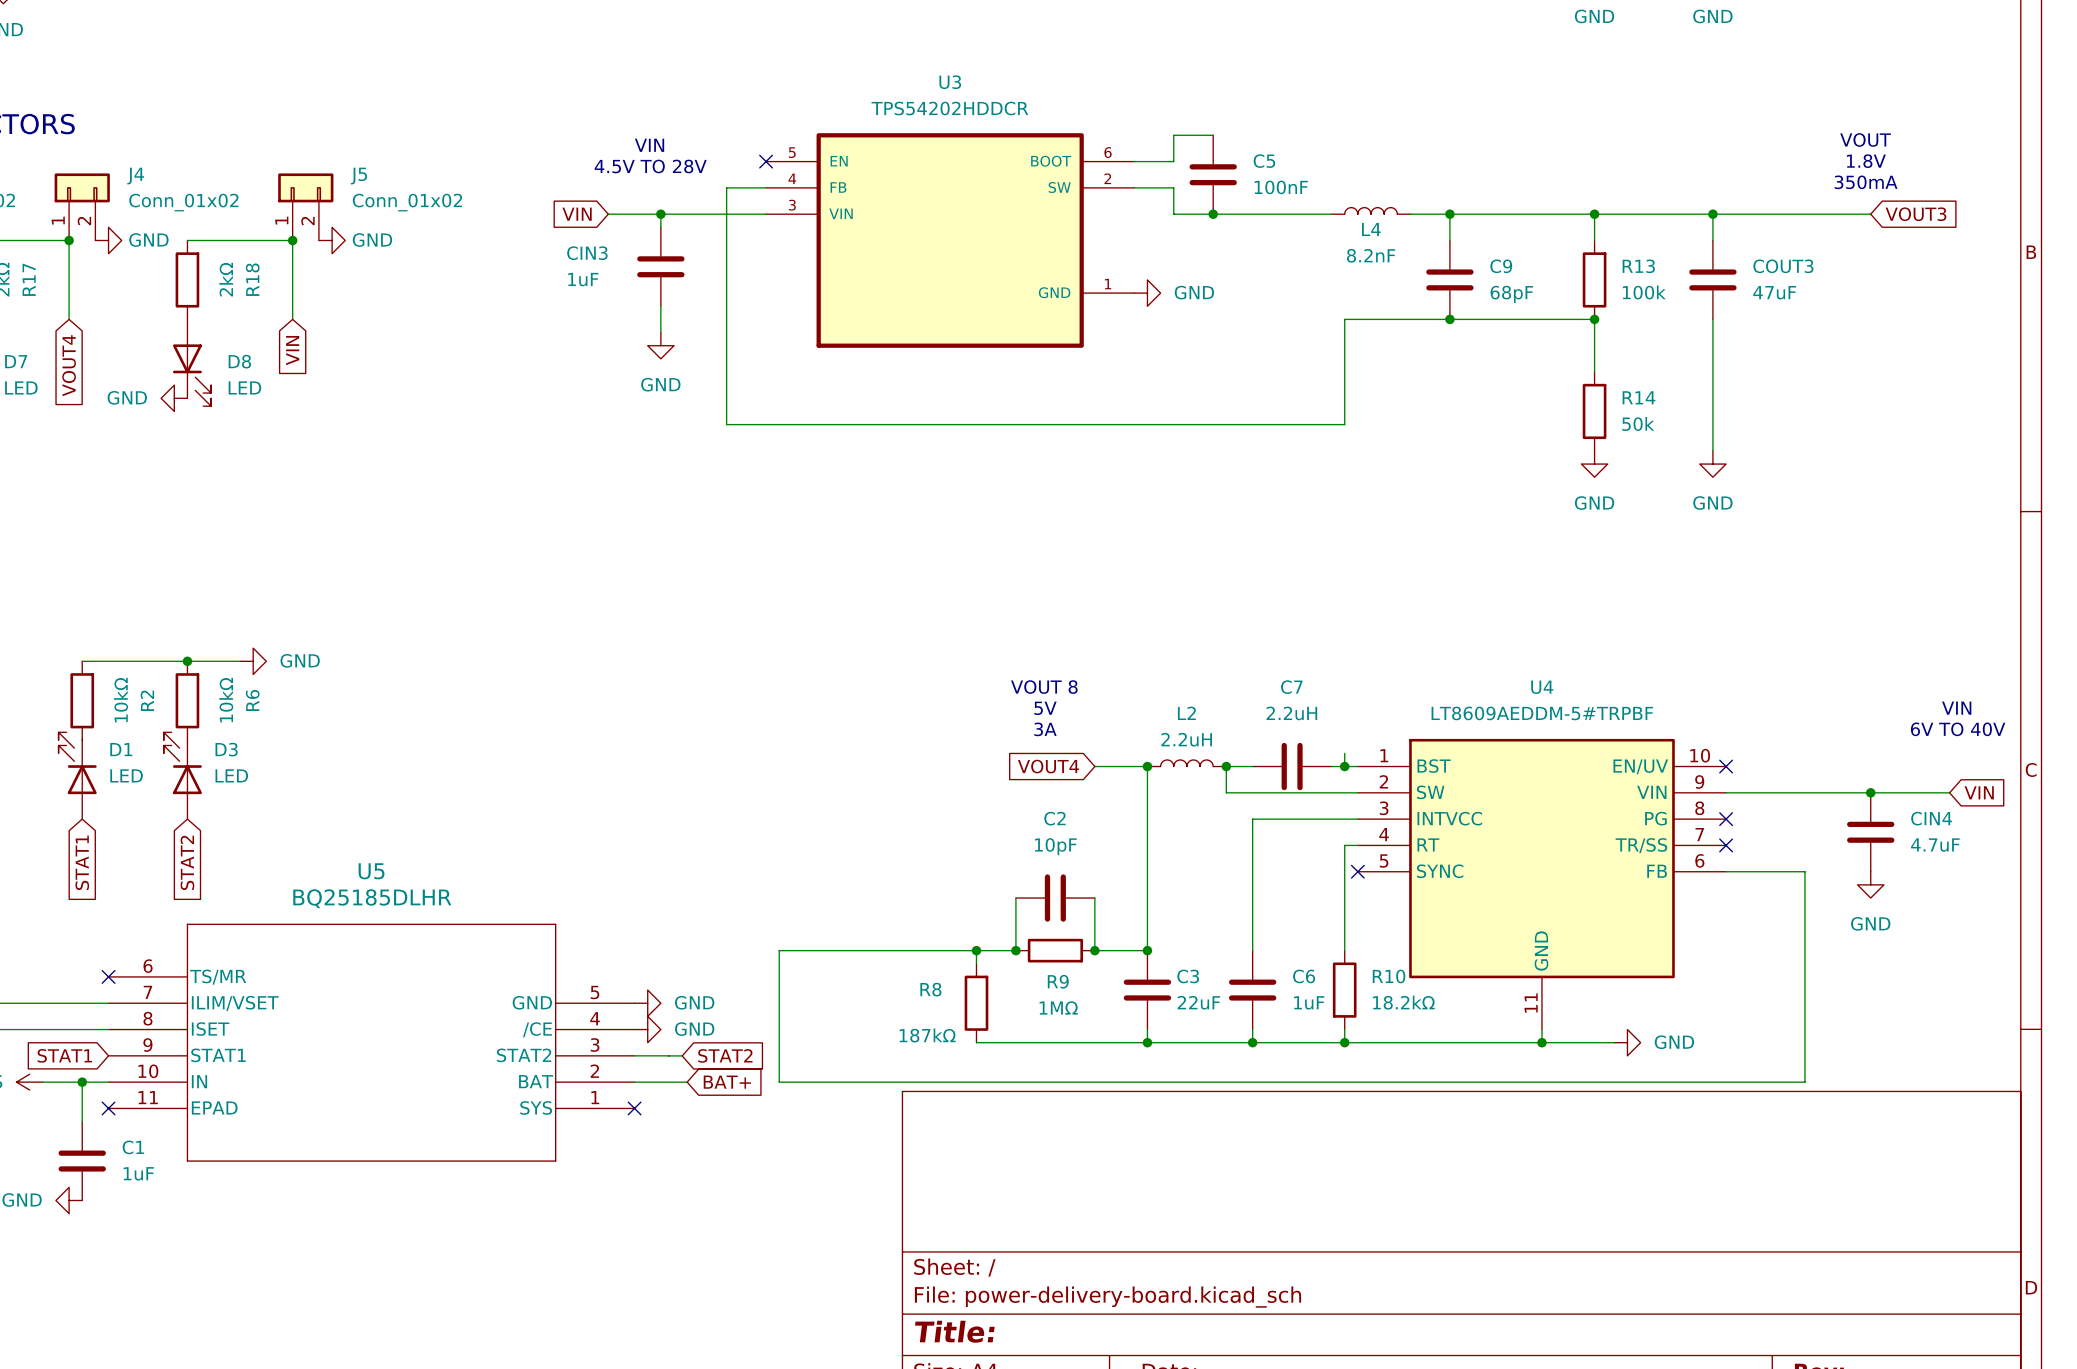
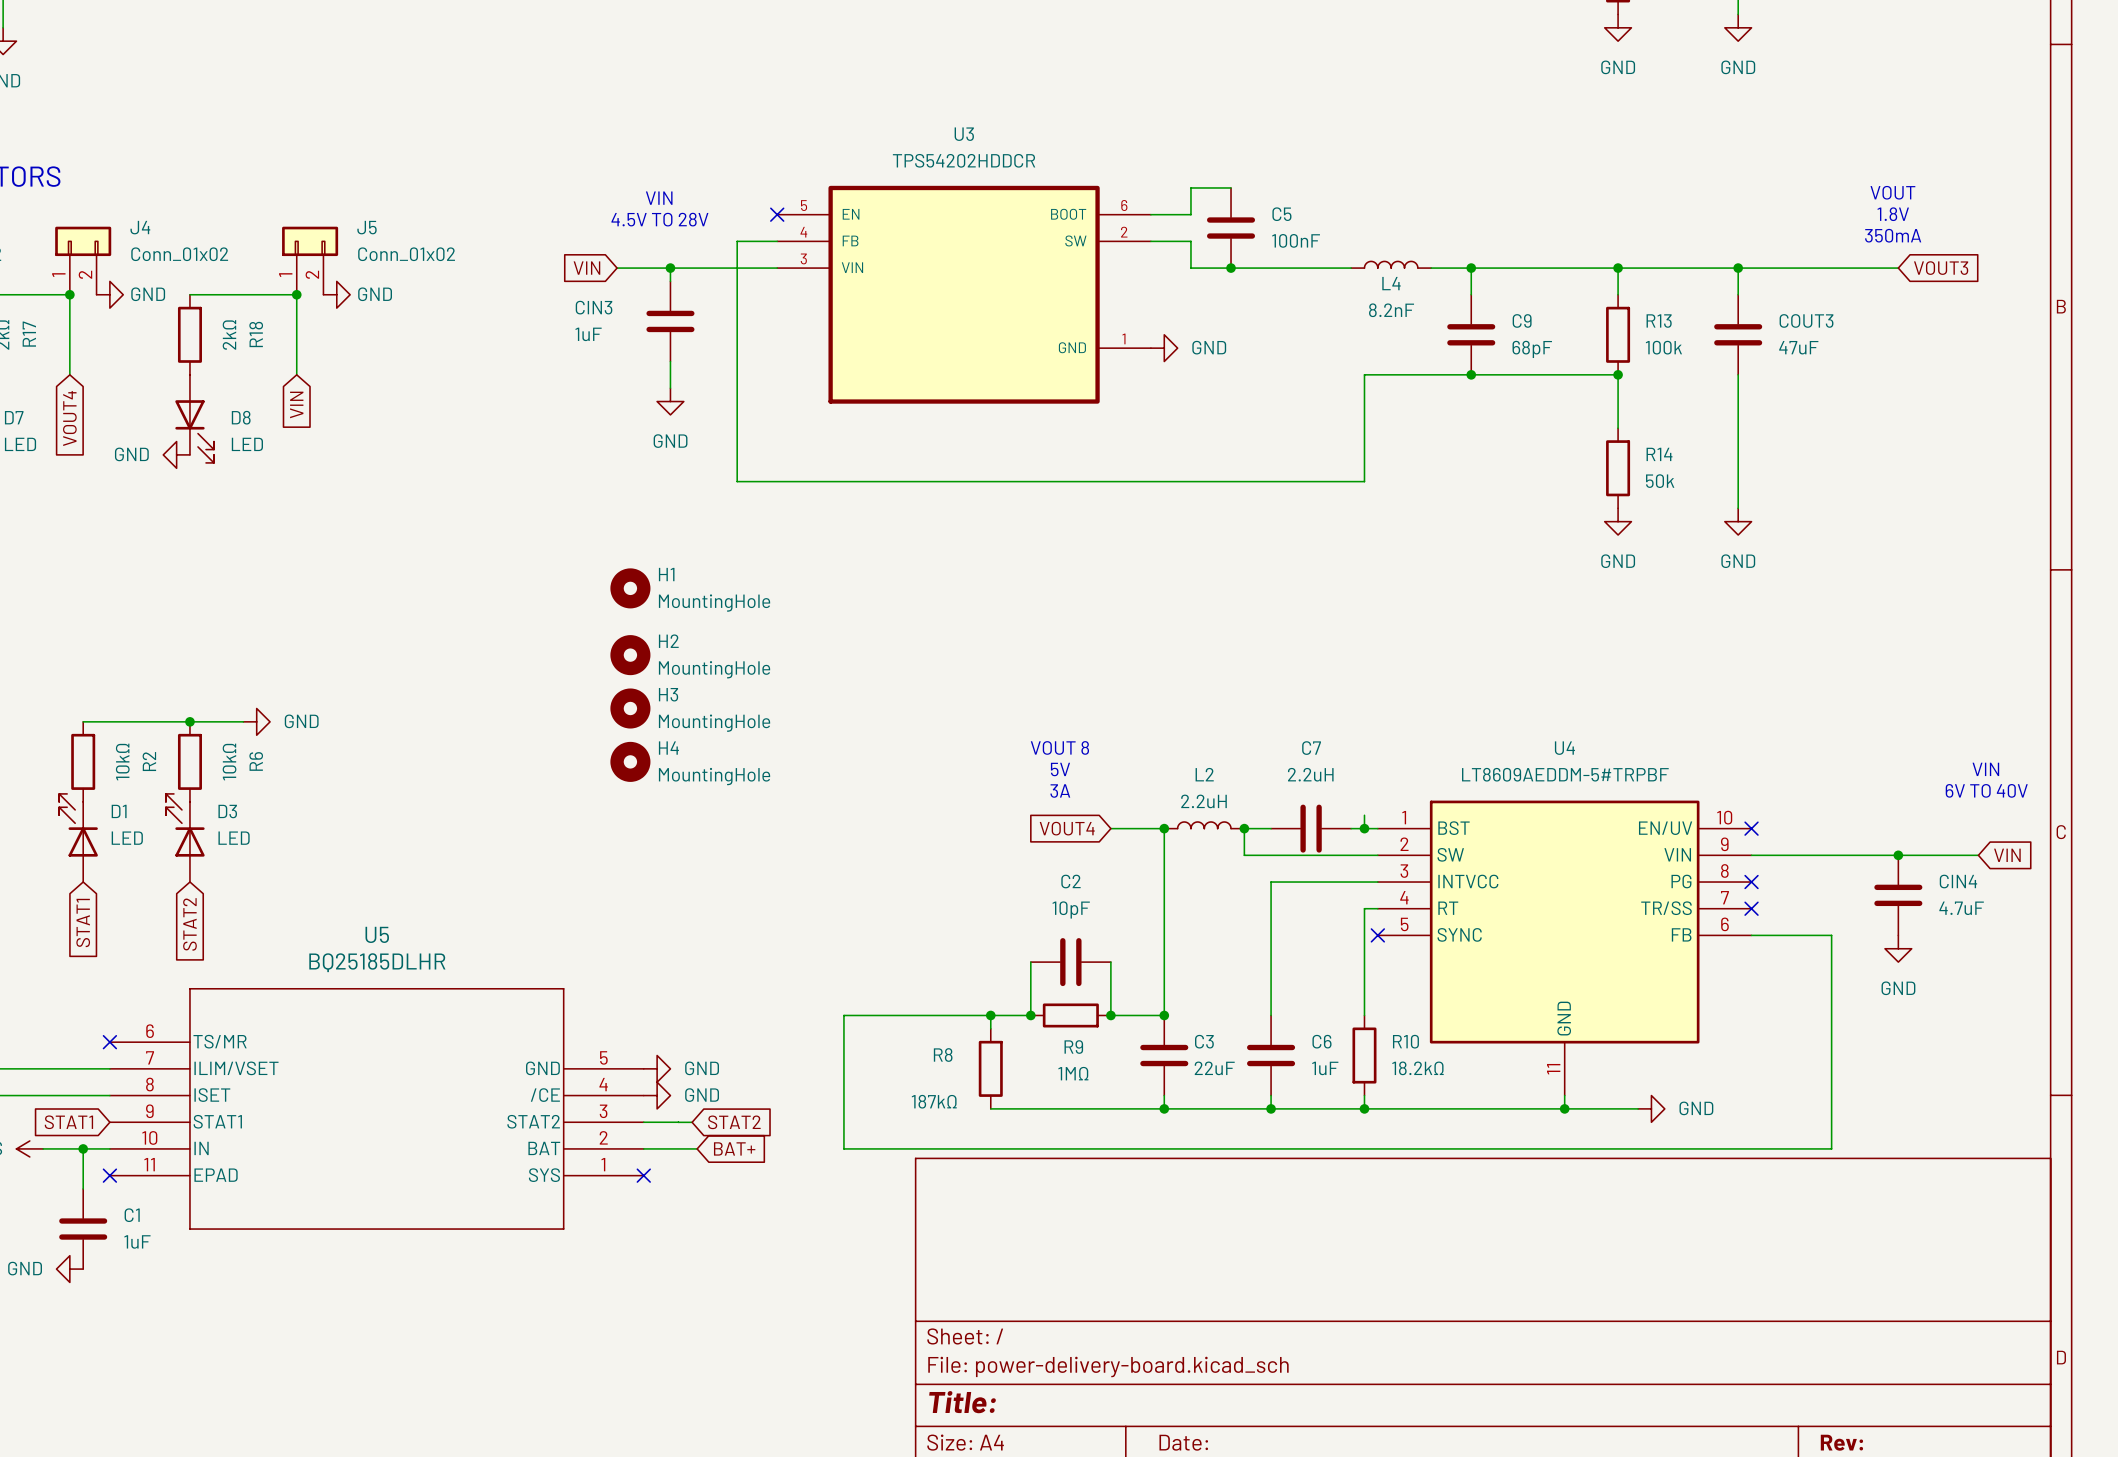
H1: none -> MountingHole (630, 588)
H2: none -> MountingHole (630, 655)
H3: none -> MountingHole (630, 708)
H4: none -> MountingHole (630, 761)
wire: (831, 950) (779, 950) (779, 1082) (831, 1082) -> (843, 1015) (843, 1148)

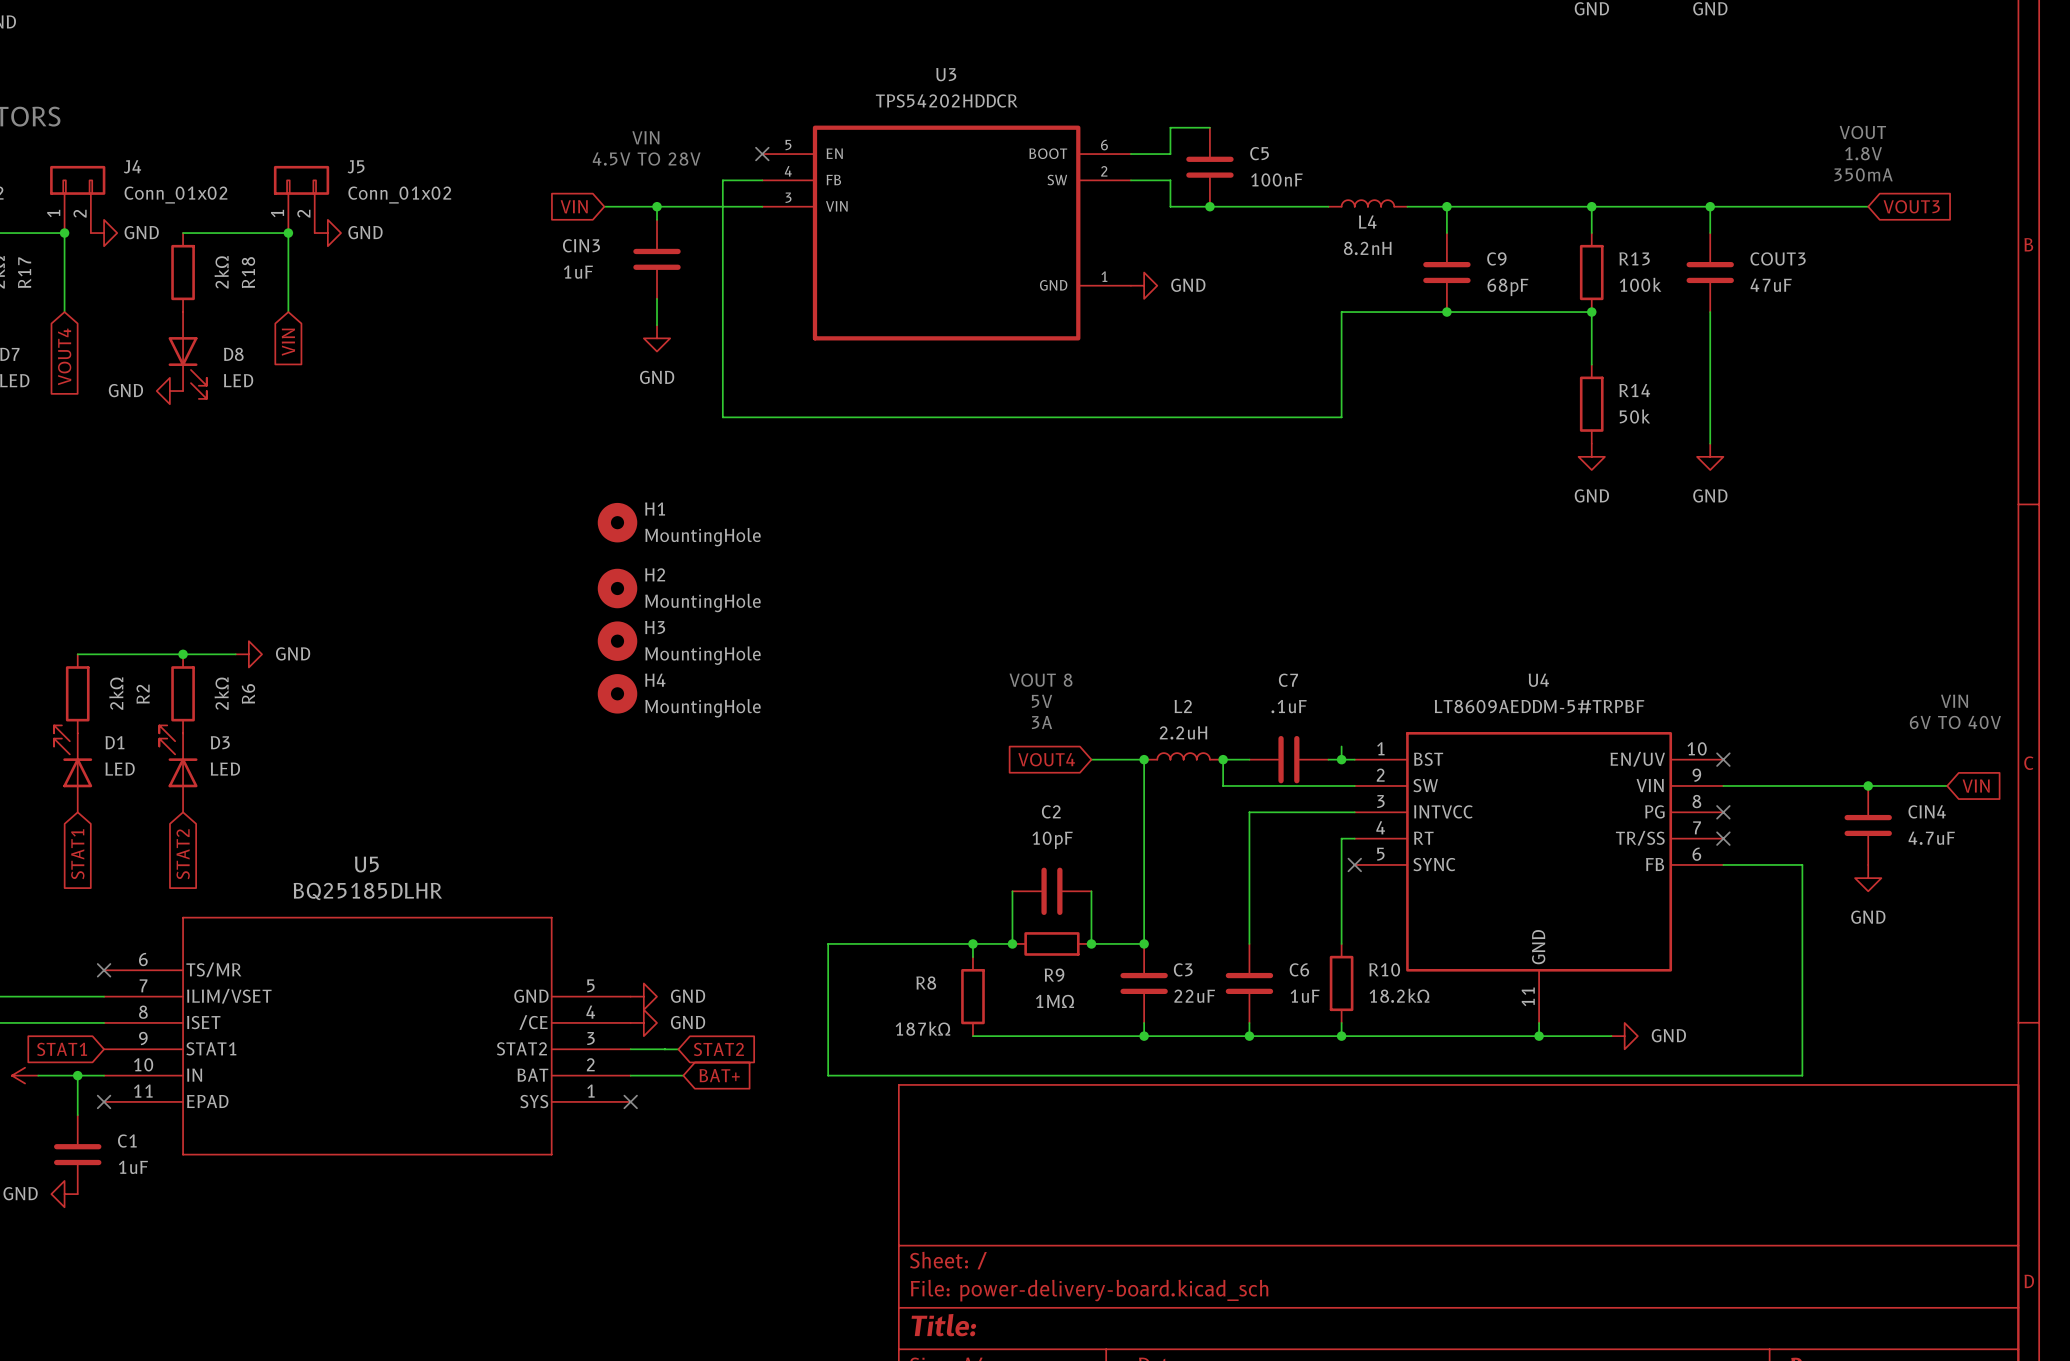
L4 value: 8.2nF (1391, 310) -> 8.2nH (1367, 248)
R2 value: 10kΩ (122, 762) -> 2kΩ (116, 693)
R6 value: 10kΩ (229, 762) -> 2kΩ (221, 693)
C7 value: 2.2uH (1310, 774) -> .1uF (1289, 706)

